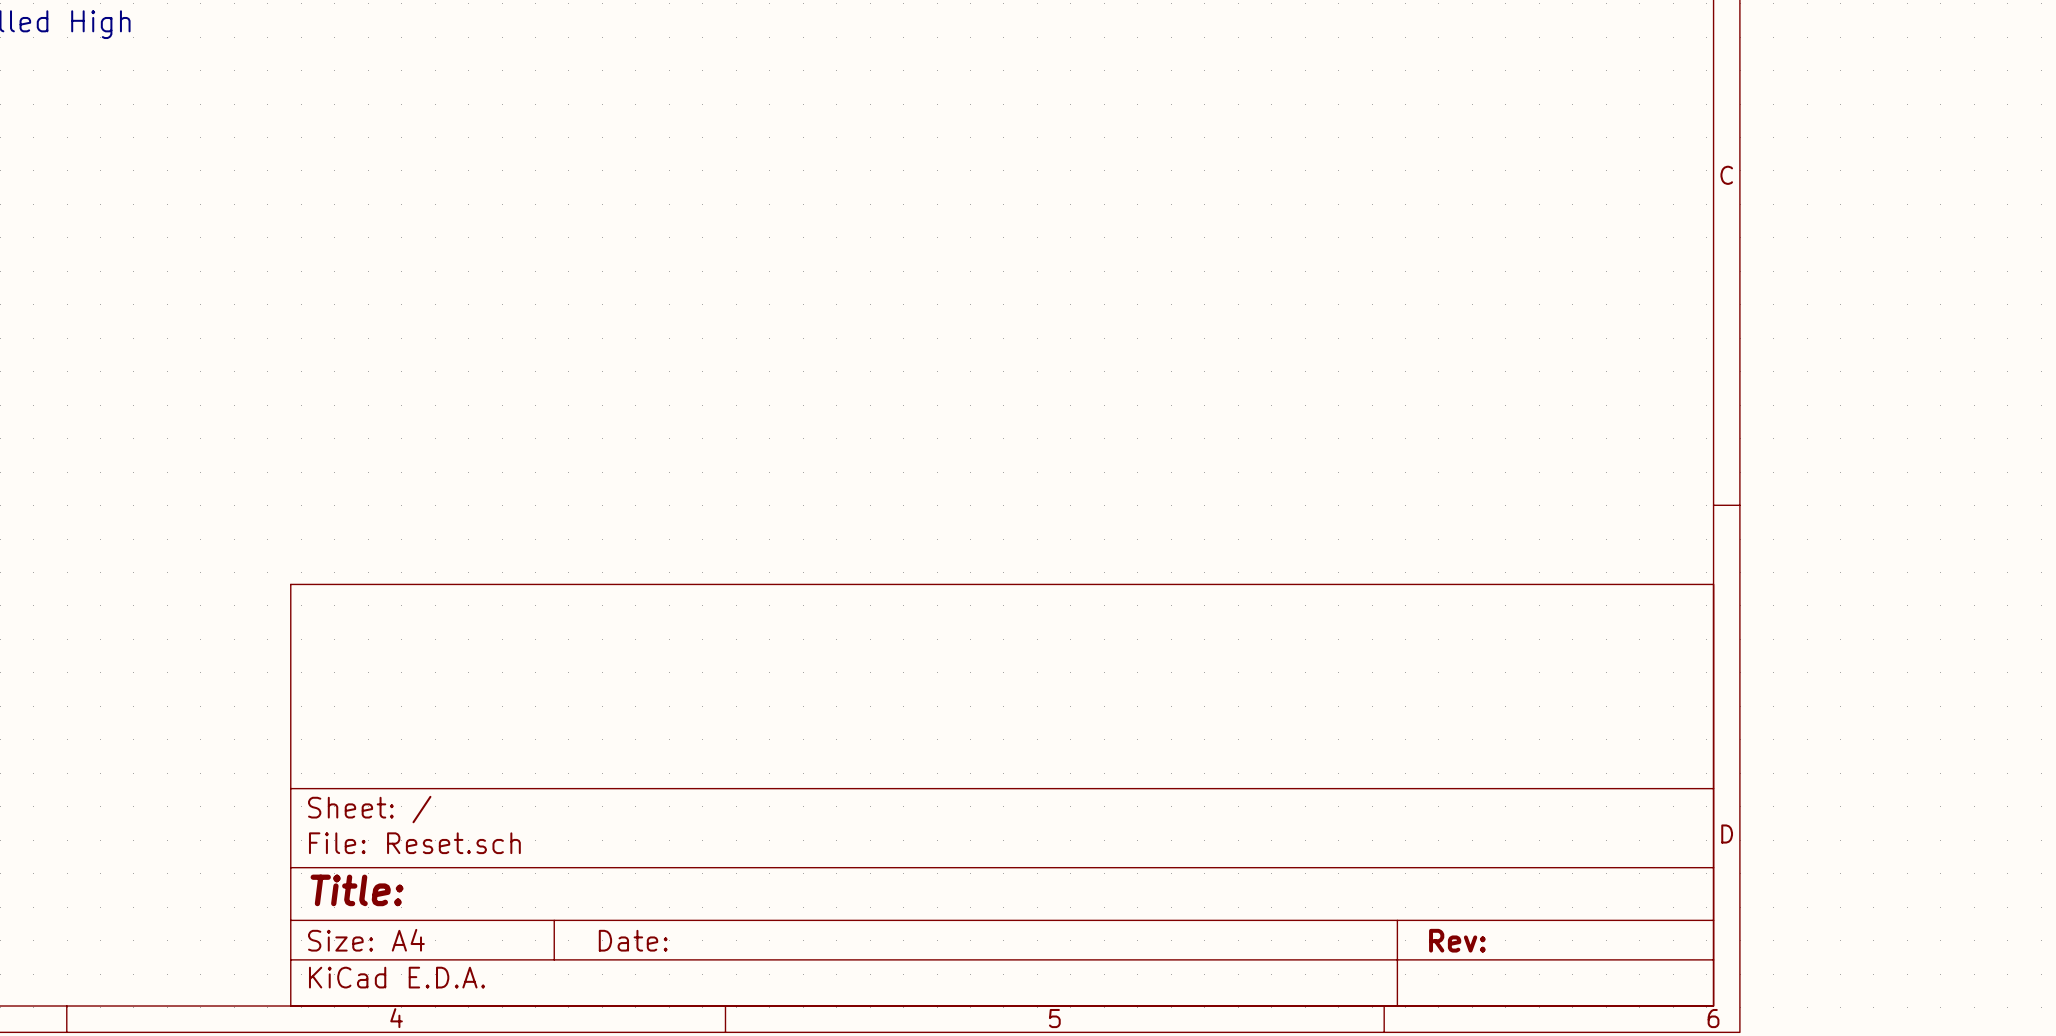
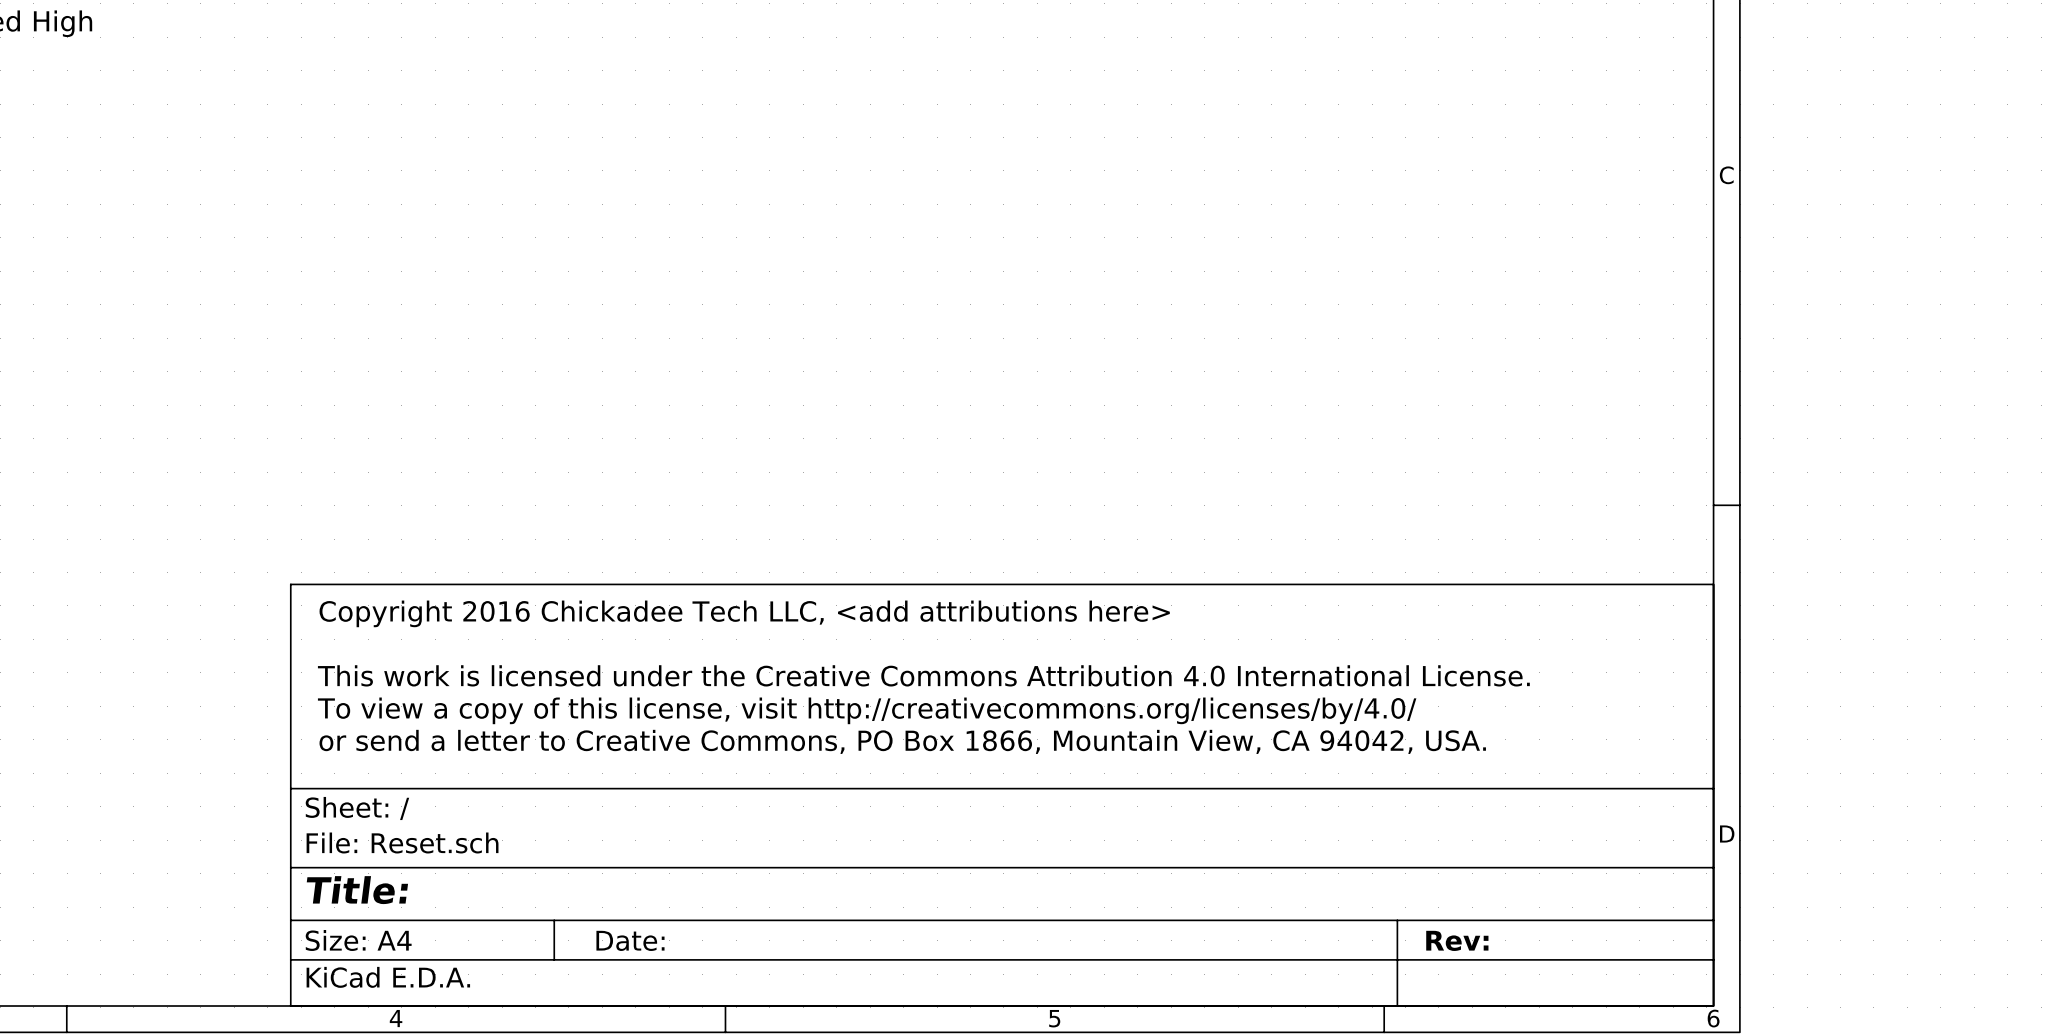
text: none -> Copyright 2016 Chickadee Tech LLC, <add attributions here> (744, 613)
text: none -> This work is licensed under the Creative Commons Attribution 4.0 International License. (923, 675)
text: none -> To view a copy of this license, visit http://creativecommons.org/licenses/by/4.0/ (867, 710)
text: none -> or send a letter to Creative Commons, PO Box 1866, Mountain View, CA 94042, USA. (902, 741)

